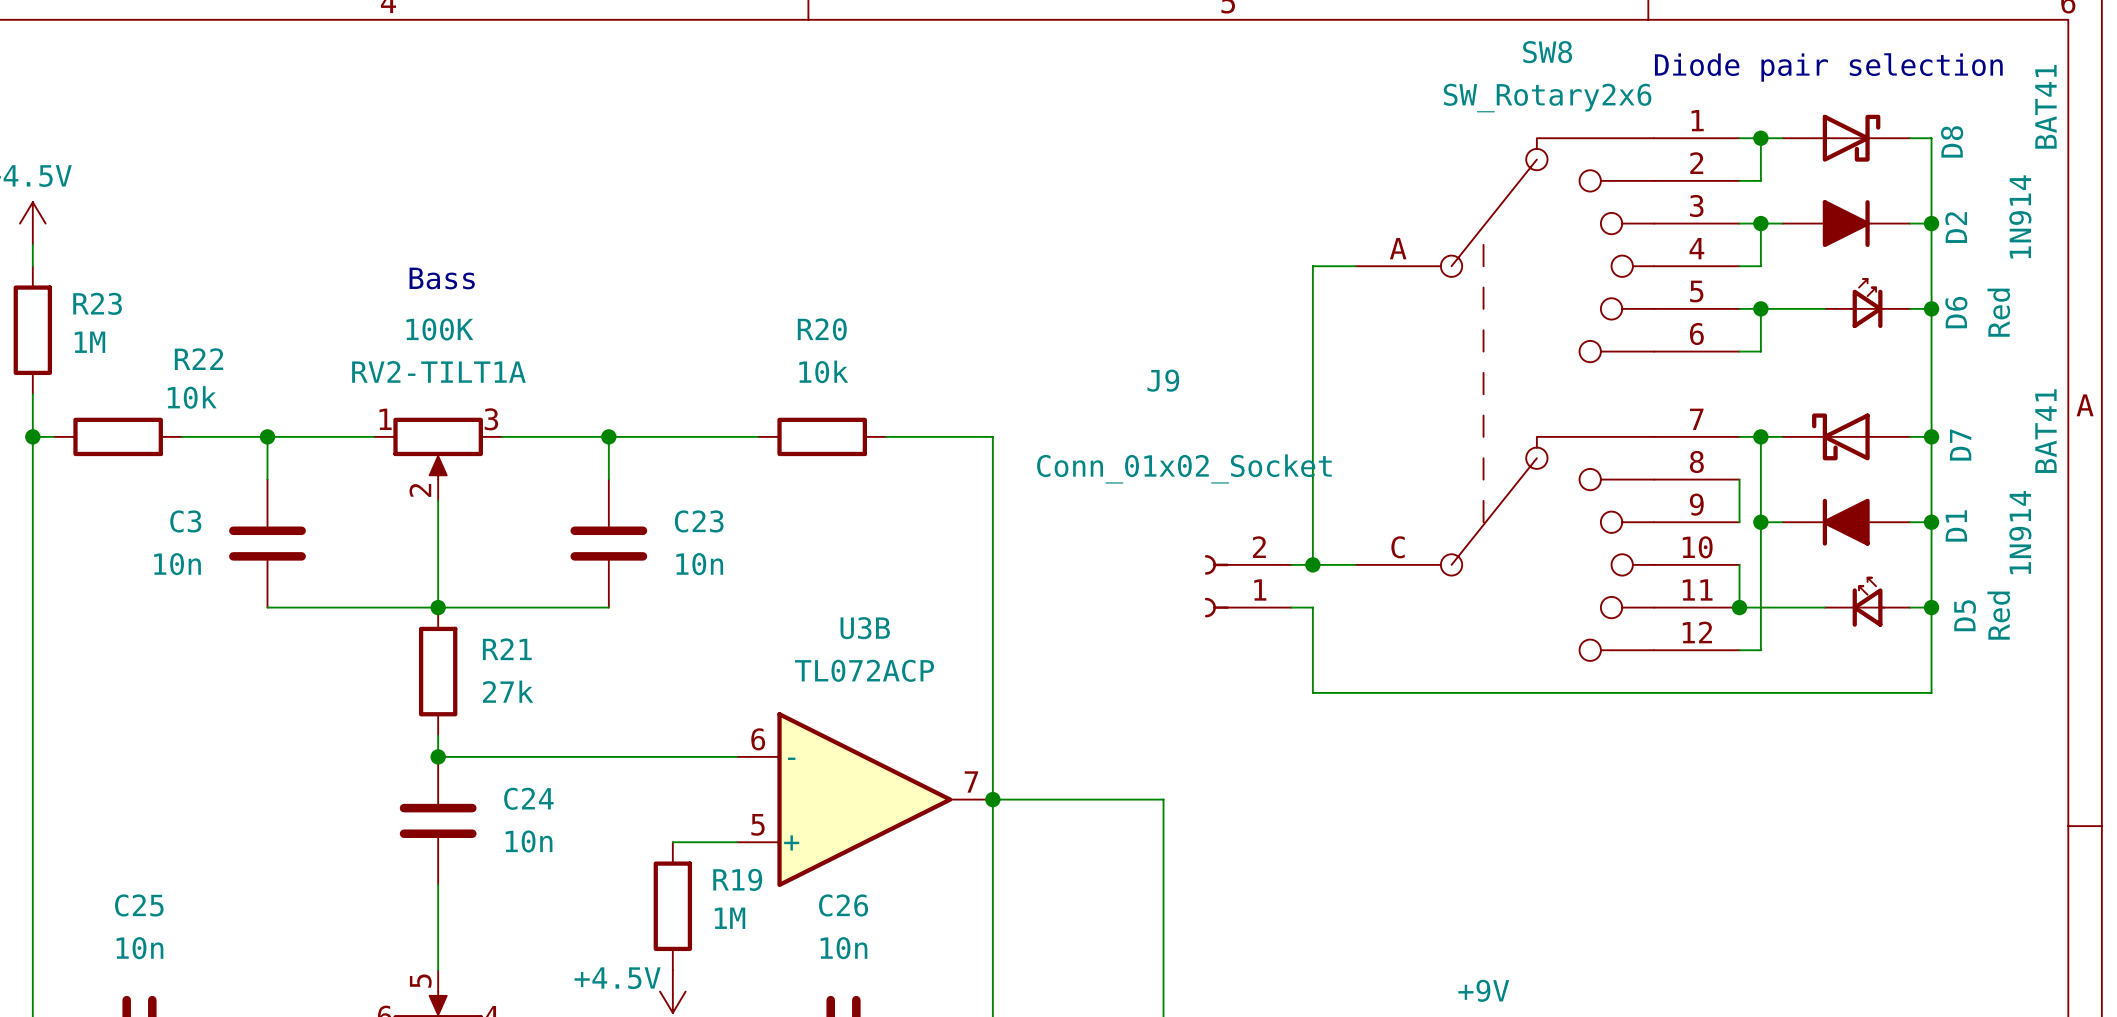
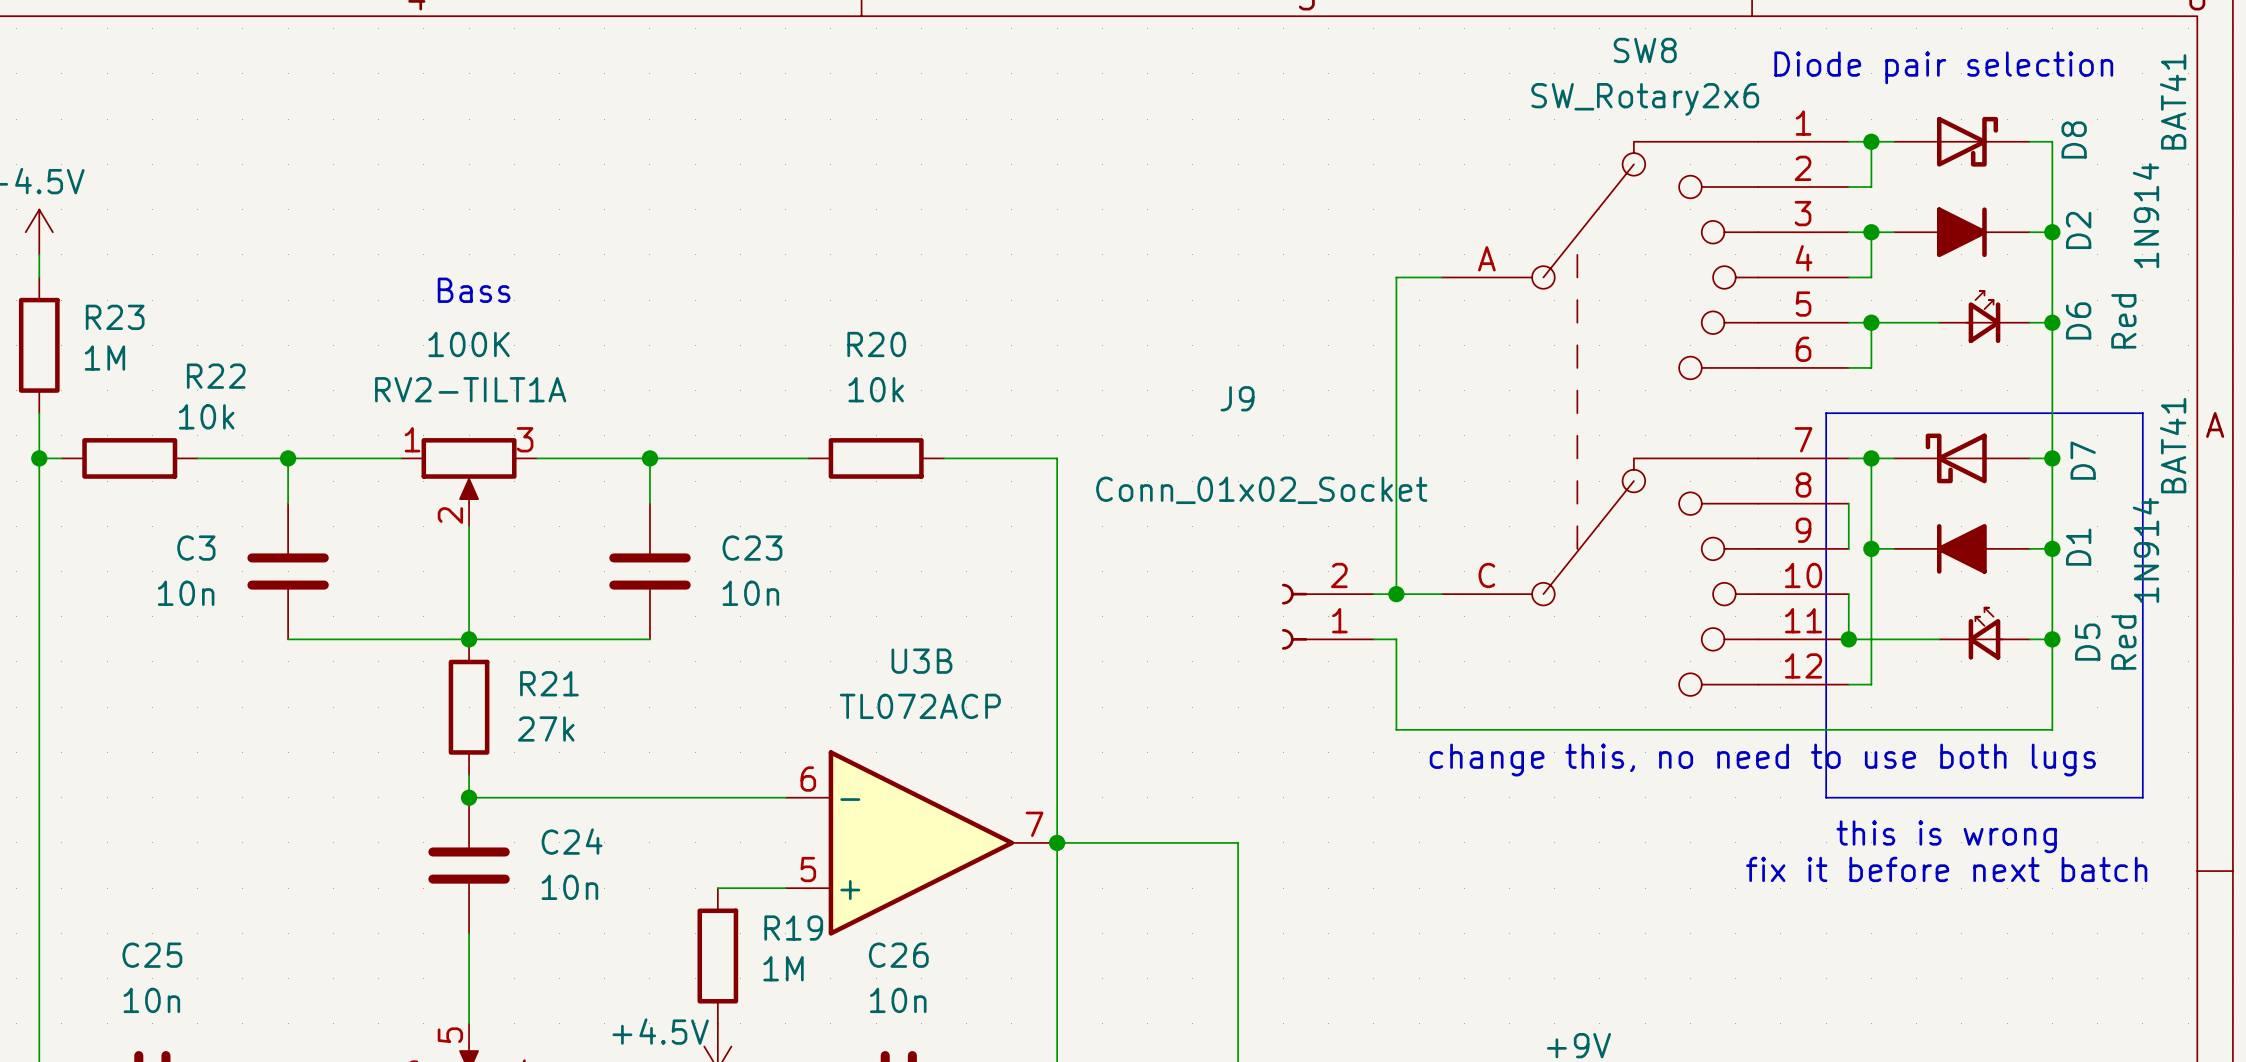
line: none -> (1826, 413) (2142, 413) (2142, 797) (1826, 797) (1826, 413)
text: none -> change this, no need to use both lugs (1762, 759)
text: none -> this is wrong (1946, 836)
text: none -> fix it before next batch (1946, 869)

